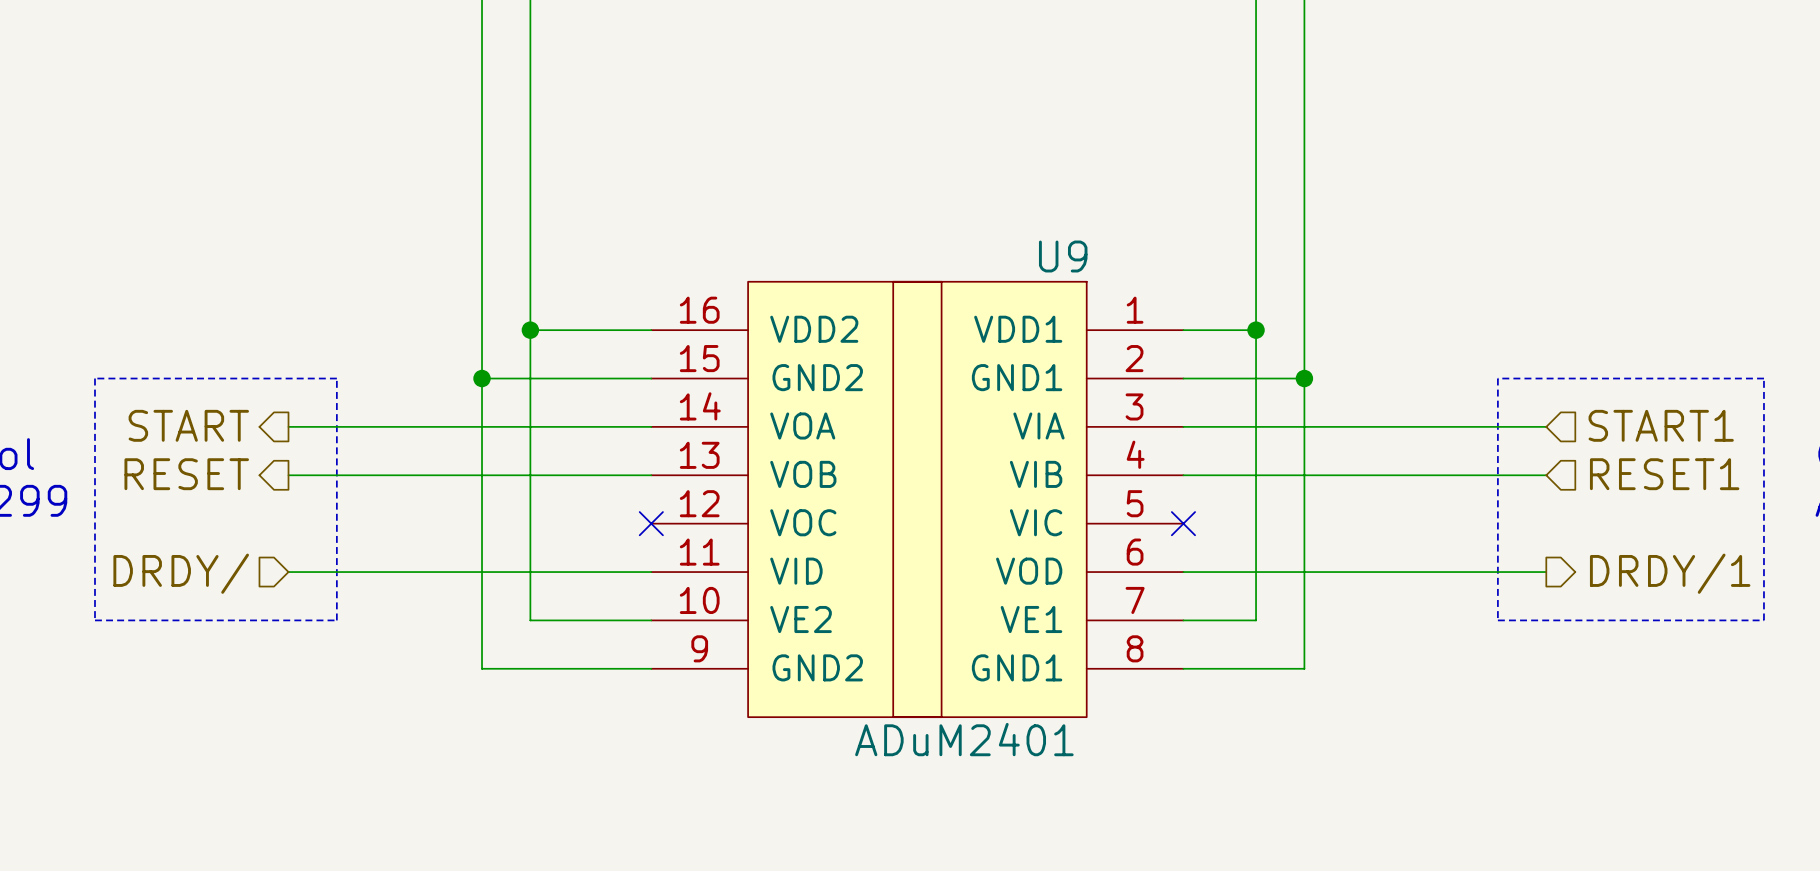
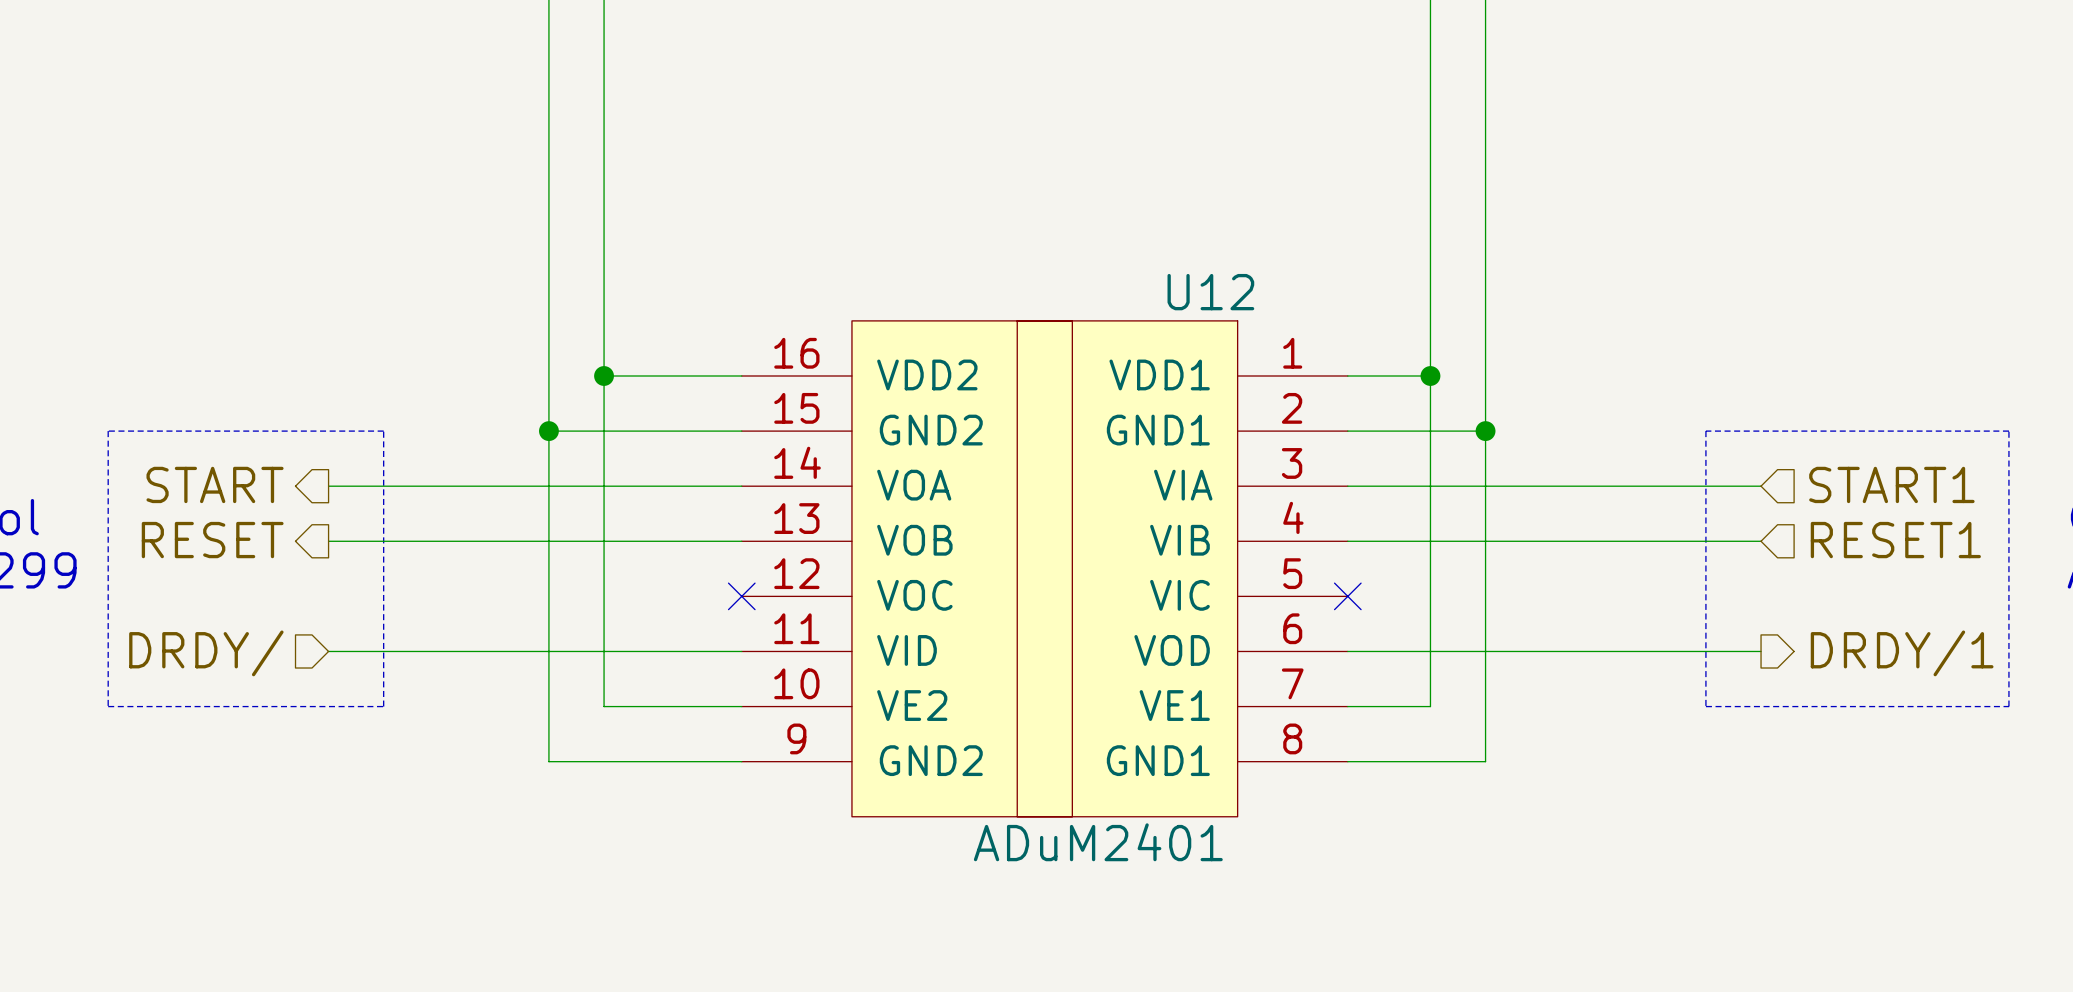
U9 name: U9 (1063, 256) -> U12 (1210, 292)

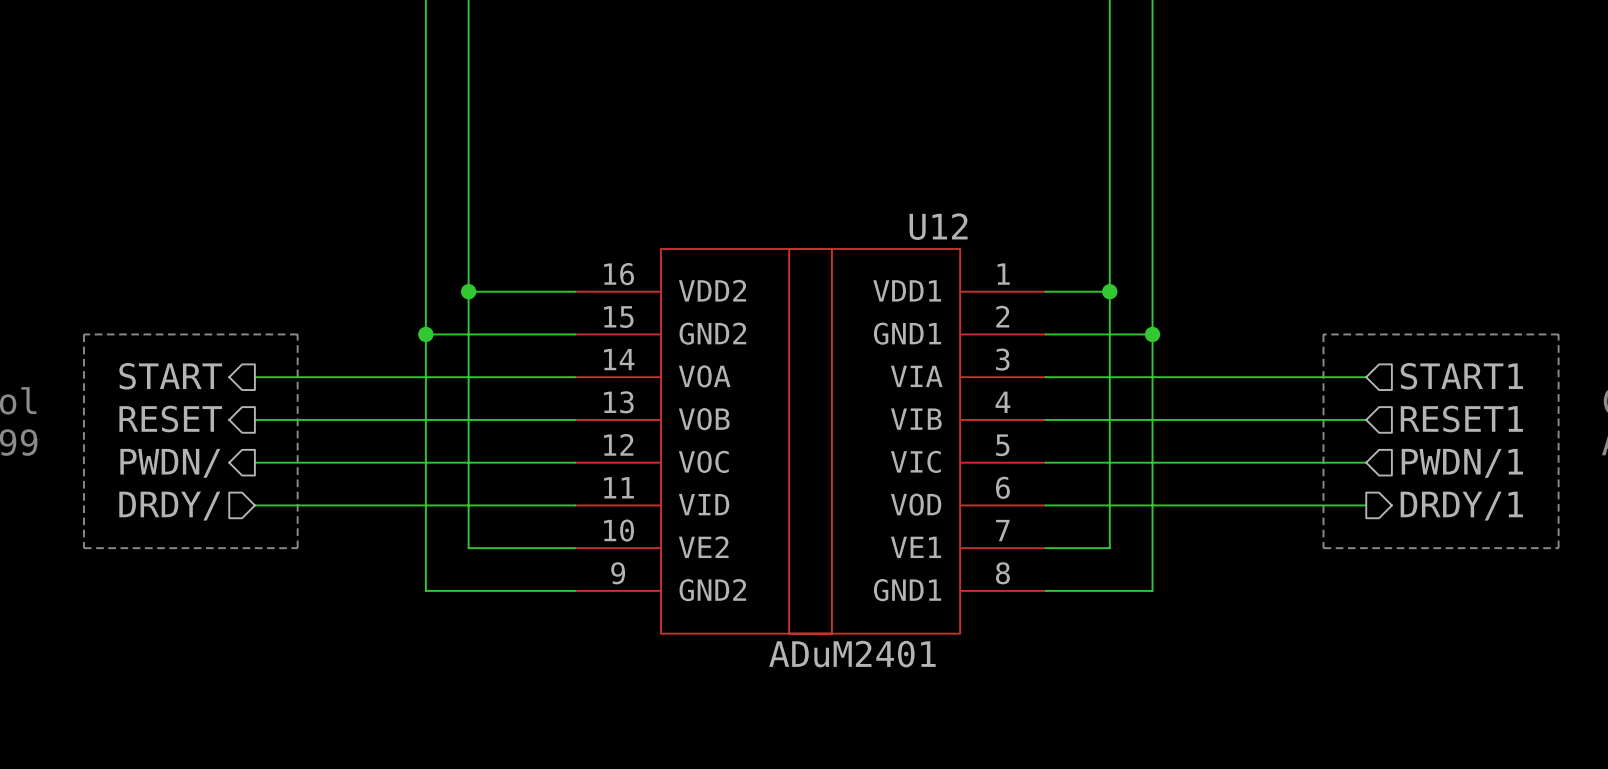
wire: none -> (254, 462) (575, 462)
no-connect mark: (741, 596) -> none
wire: none -> (1045, 462) (1366, 462)
no-connect mark: (1347, 596) -> none
hierarchical label: none -> PWDN/ (170, 463)
hierarchical label: none -> PWDN/1 (1462, 463)

